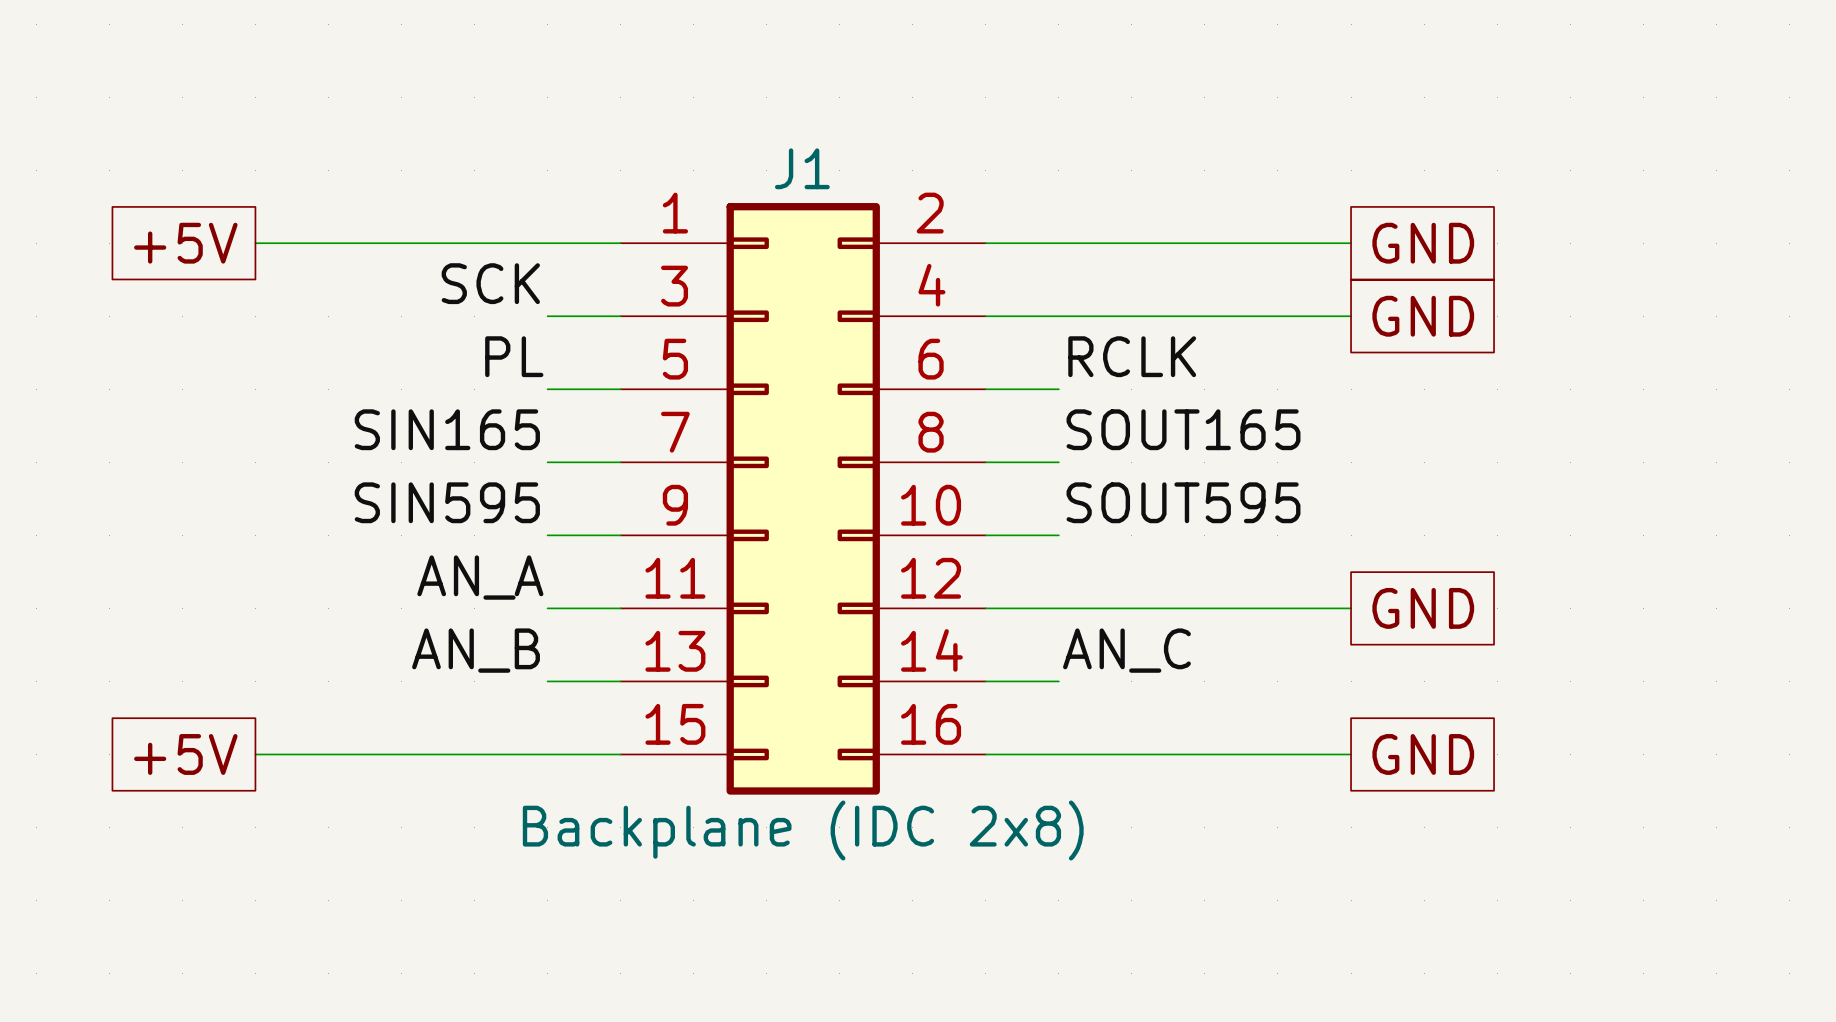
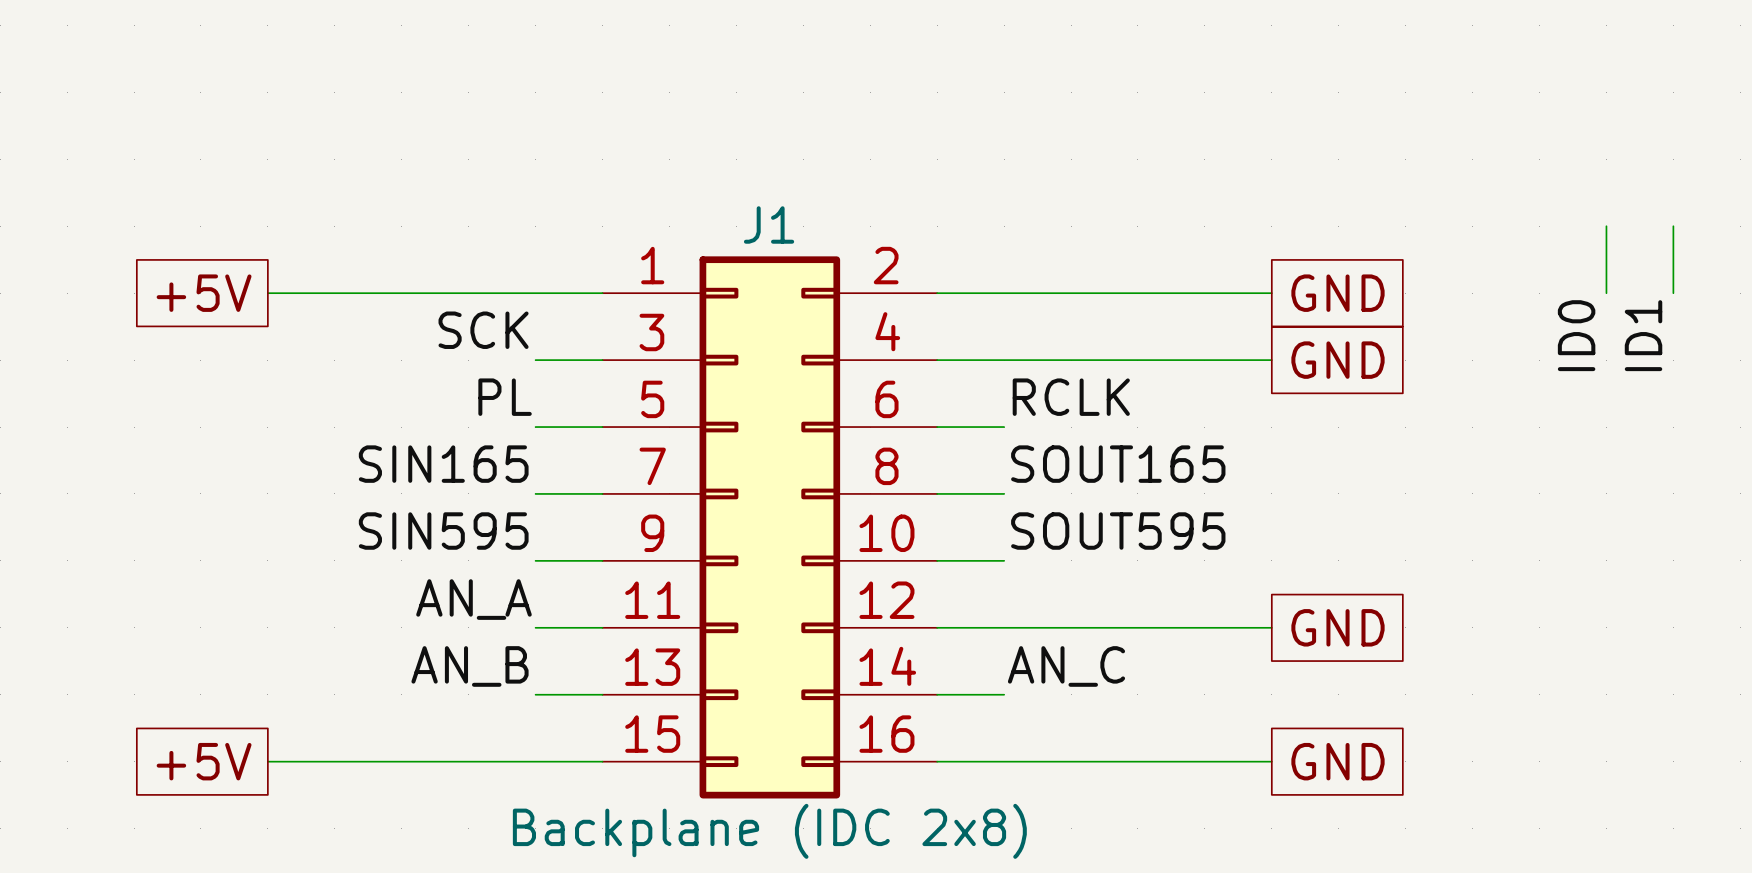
global label position: +5V (185, 243) -> +5V (204, 293)
wire: (255, 243) (620, 243) -> (267, 761) (602, 761)
wire: (985, 243) (1351, 243) -> (937, 761) (1271, 761)
global label: GND (1423, 243) -> none
label: SCK (490, 283) -> none
wire: (547, 316) (620, 316) -> (535, 694) (602, 694)
wire: (985, 316) (1351, 316) -> none
global label position: GND (1423, 316) -> GND (1337, 293)
wire: none -> (1606, 226) (1606, 293)
wire: none -> (1673, 226) (1673, 293)
label: PL (514, 356) -> none
label: RCLK (1132, 356) -> none
wire: none -> (1004, 293) (1271, 293)
label: SIN165 (447, 429) -> SCK (483, 330)
label position: SOUT165 (1183, 429) -> SOUT165 (1118, 464)
label: none -> ID0 (1576, 335)
label: none -> ID1 (1643, 335)
global label: none -> GND (1337, 360)
J1 position: (803, 498) -> (769, 527)
label: SIN595 (447, 502) -> PL (505, 397)
label: SOUT595 (1183, 502) -> RCLK (1071, 397)
label: AN_A (480, 577) -> SIN165 (443, 464)
wire: (1058, 608) (1351, 608) -> (1004, 360) (1271, 360)
global label: GND (1423, 608) -> none
label: AN_B (476, 650) -> SIN595 (443, 531)
label: AN_C (1126, 650) -> SOUT595 (1118, 531)
label: none -> AN_A (473, 599)
global label position: +5V (185, 754) -> +5V (204, 761)
wire: (255, 754) (547, 754) -> (267, 293) (535, 293)
label: none -> AN_B (470, 666)
label: none -> AN_C (1066, 666)
wire: none -> (937, 694) (1004, 694)
global label: none -> GND (1337, 761)

